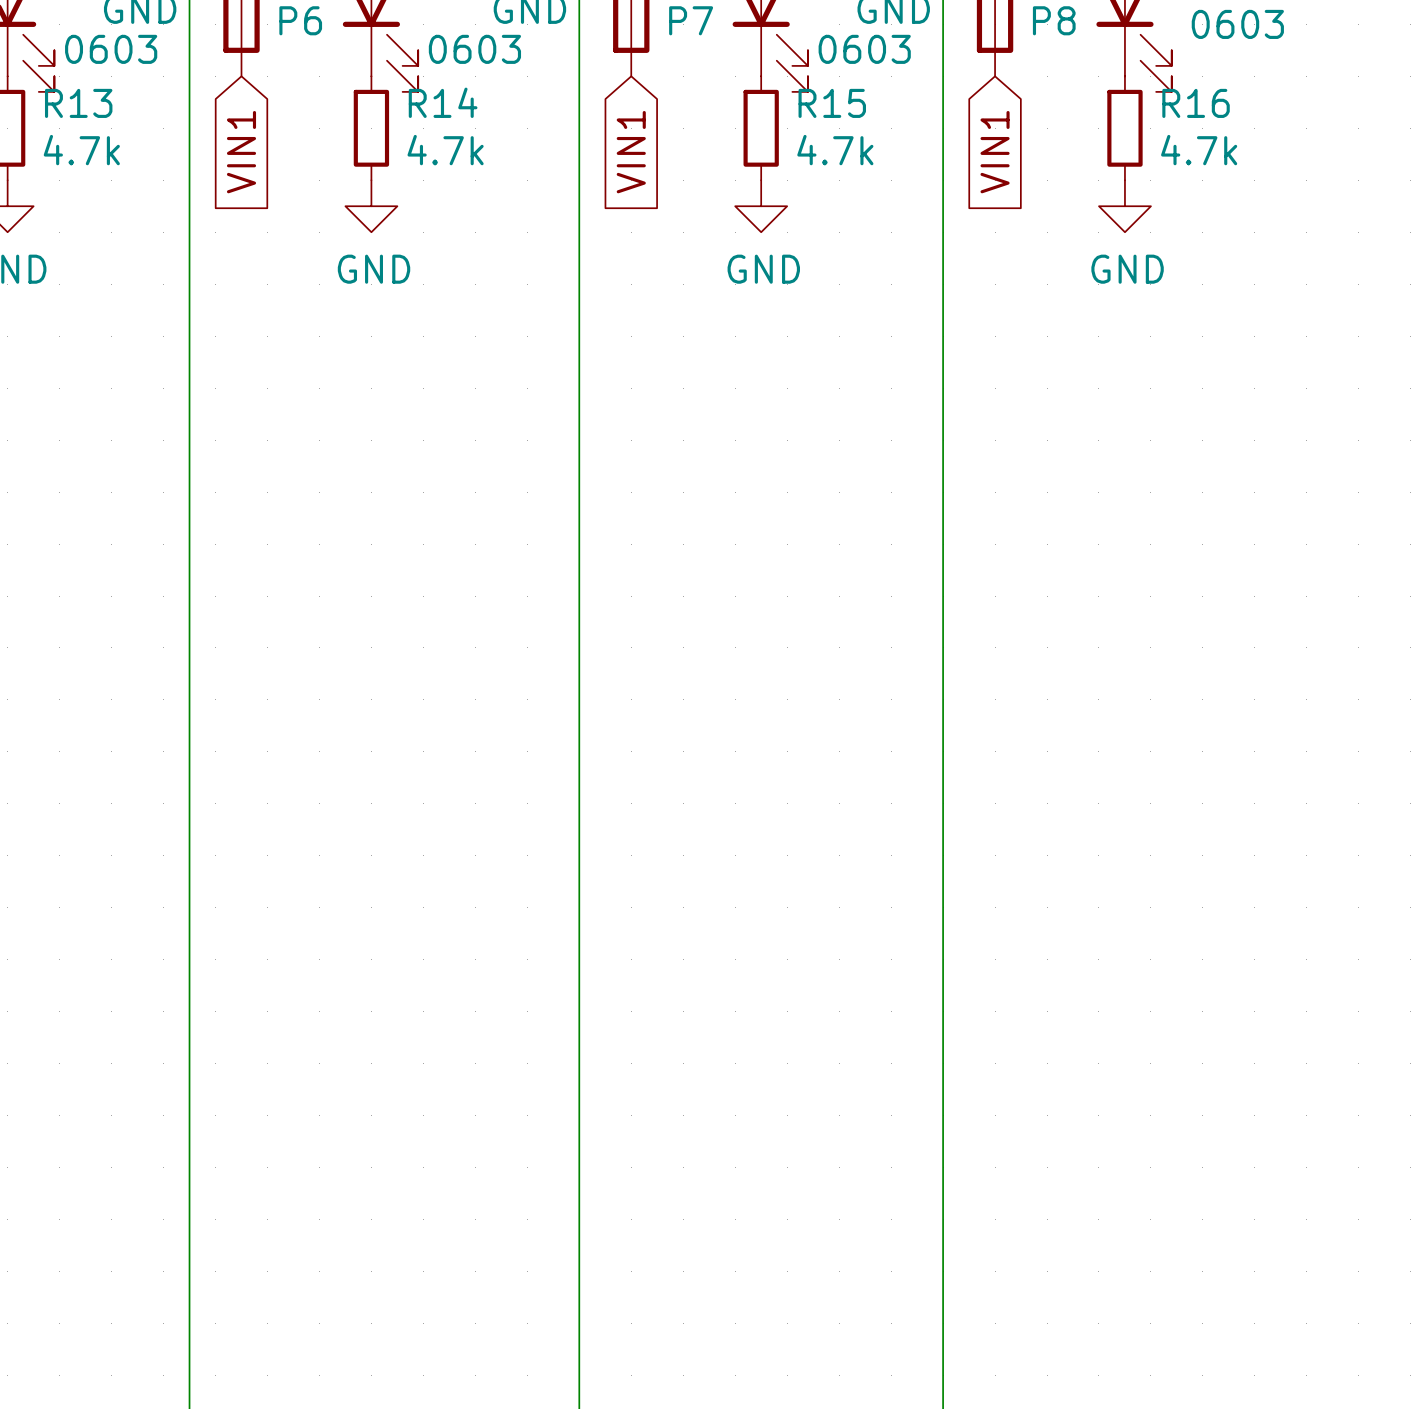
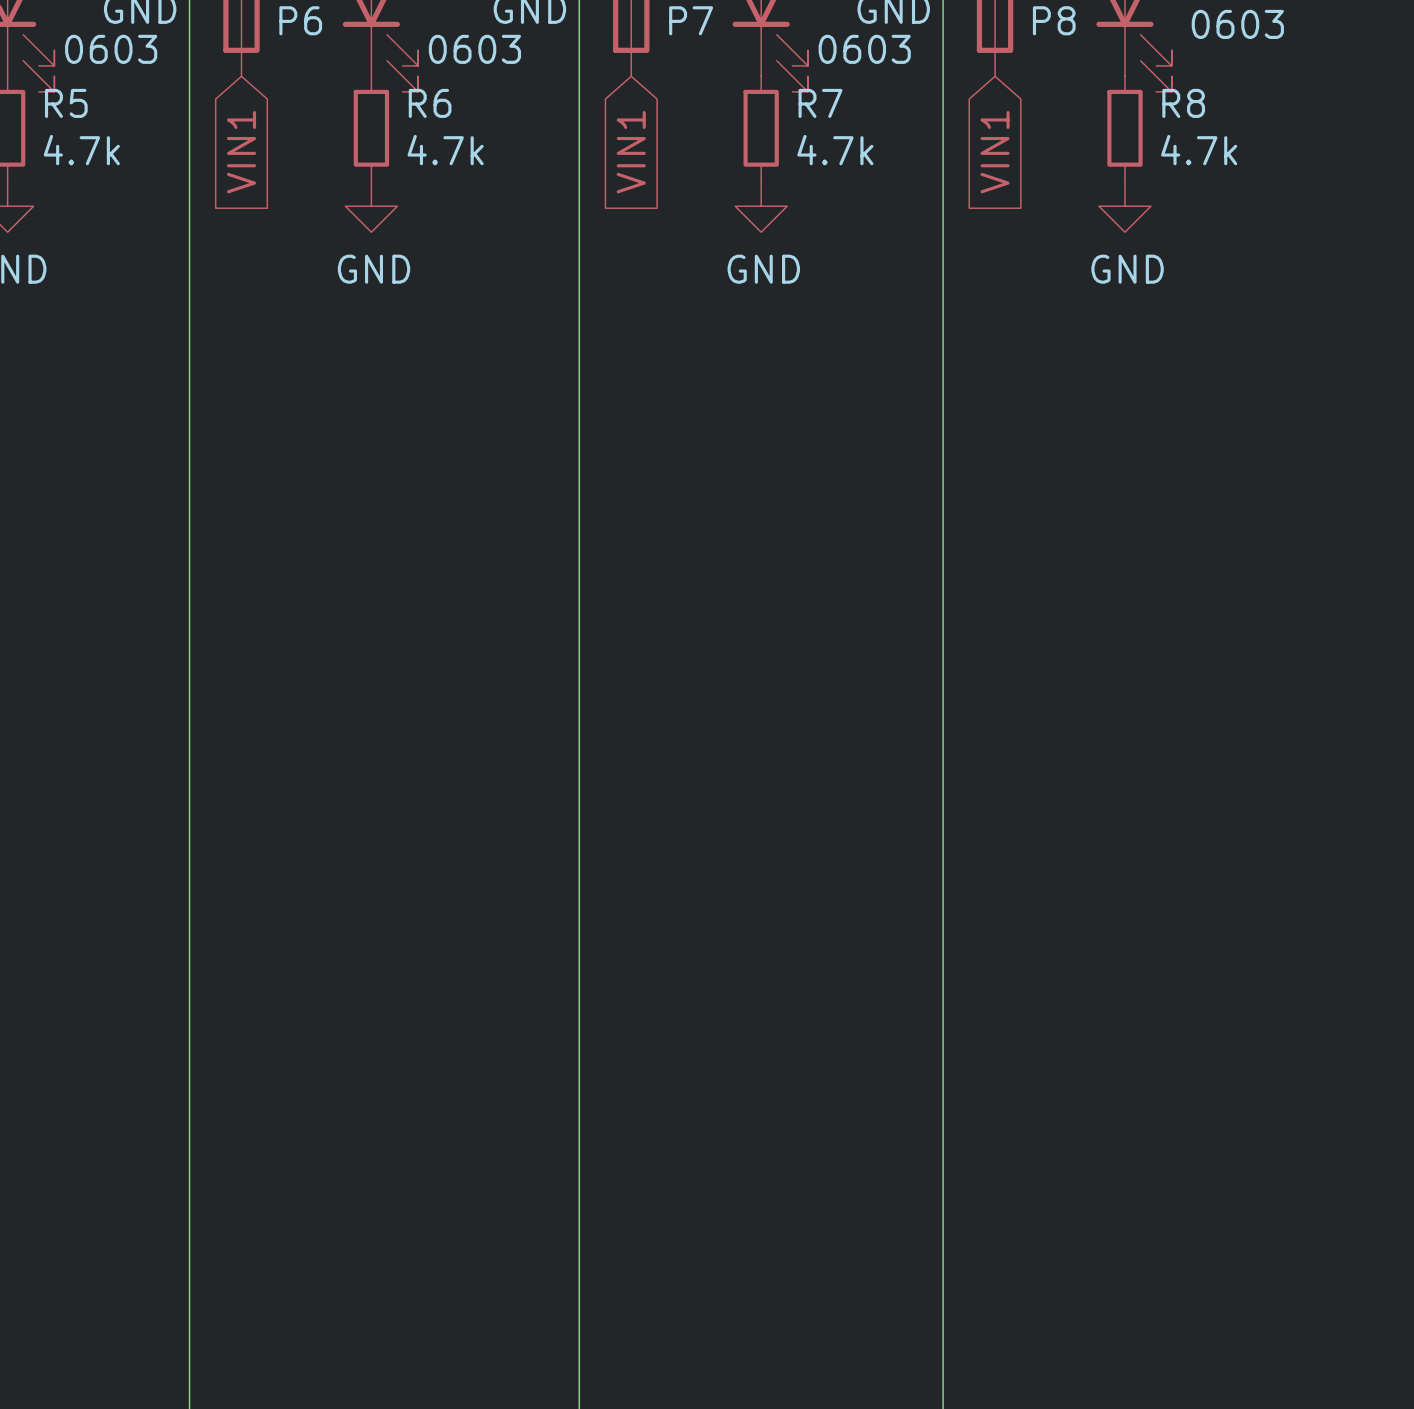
R14 name: R14 (443, 102) -> R6 (430, 103)
R13 name: R13 (78, 103) -> R5 (66, 103)
R15 name: R15 (832, 103) -> R7 (820, 103)
R16 name: R16 (1196, 103) -> R8 (1183, 103)

